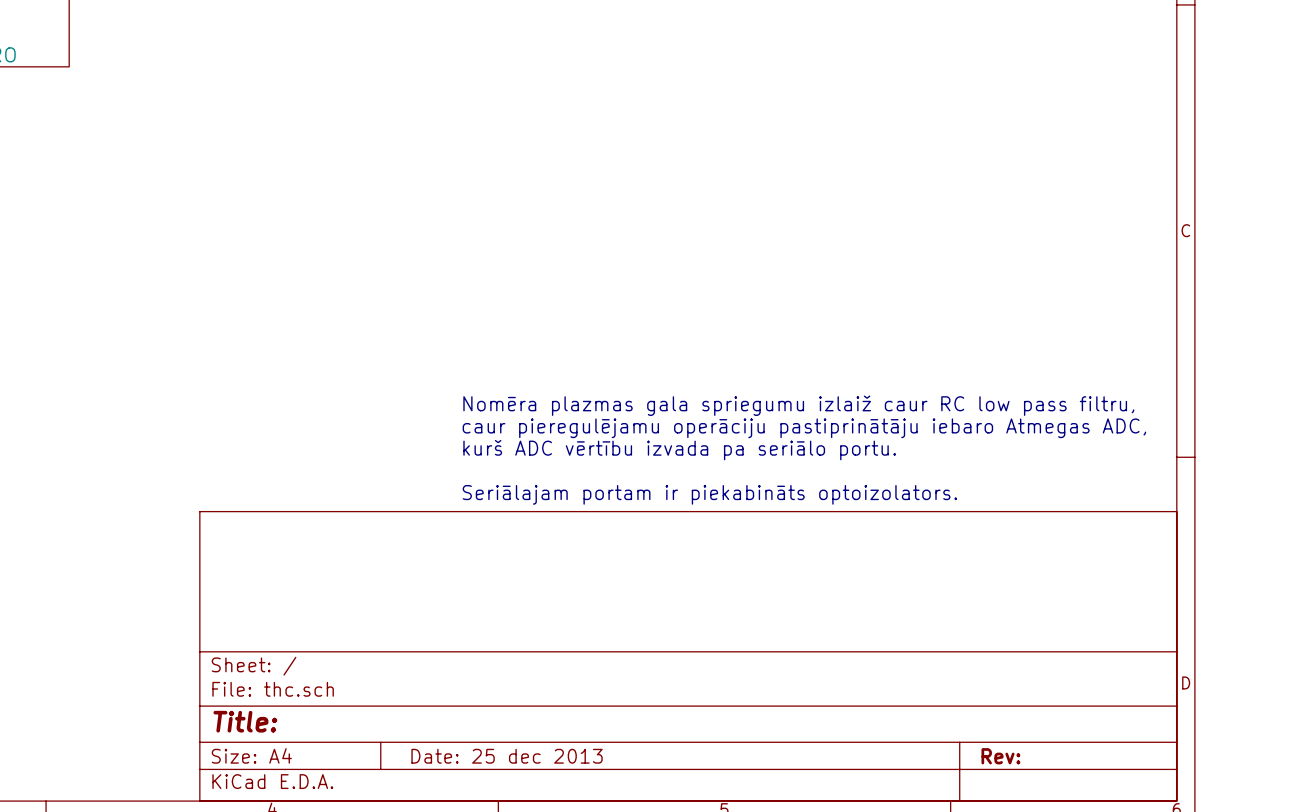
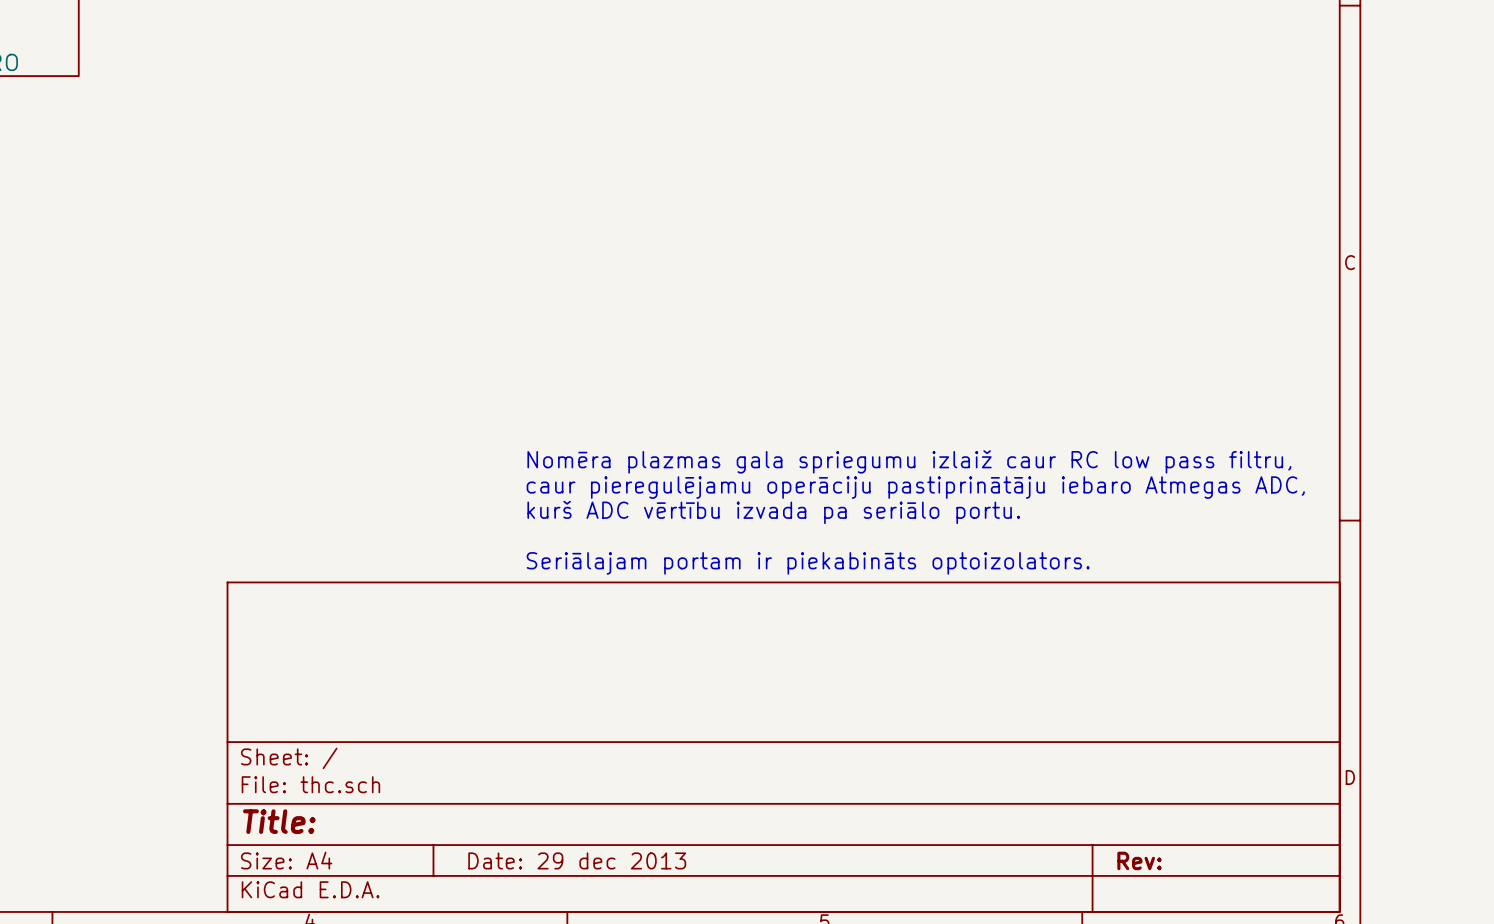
title block: Date: 25 dec 2013 (507, 756) -> Date: 29 dec 2013 (577, 860)

